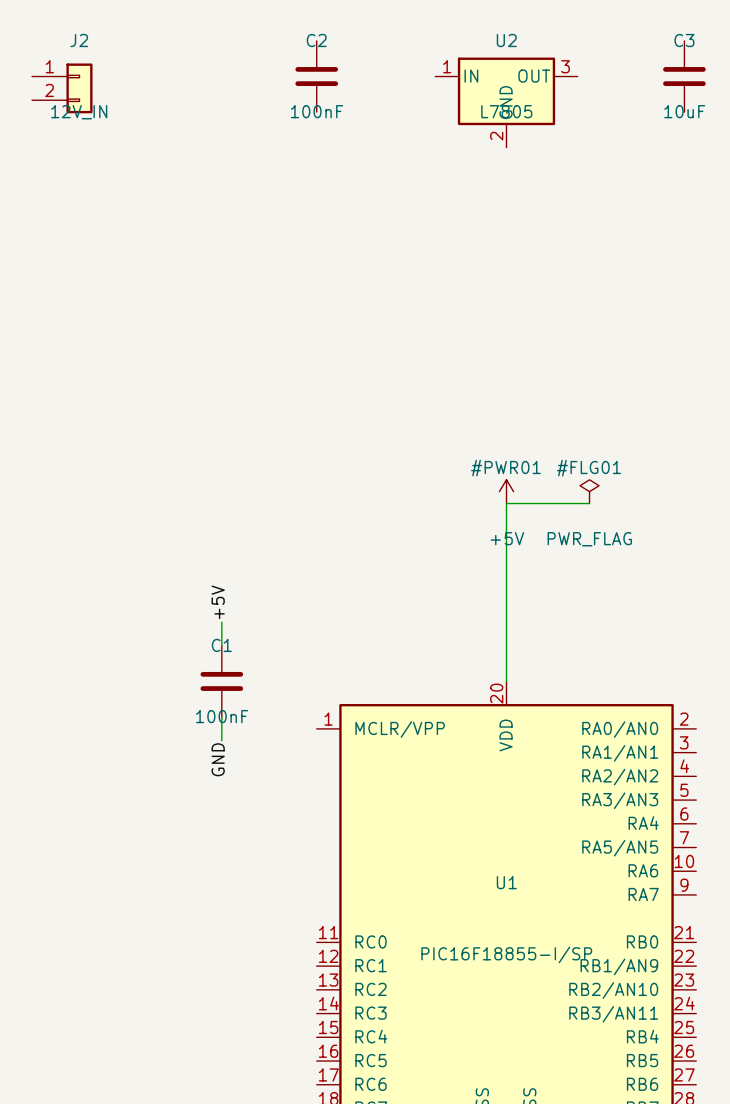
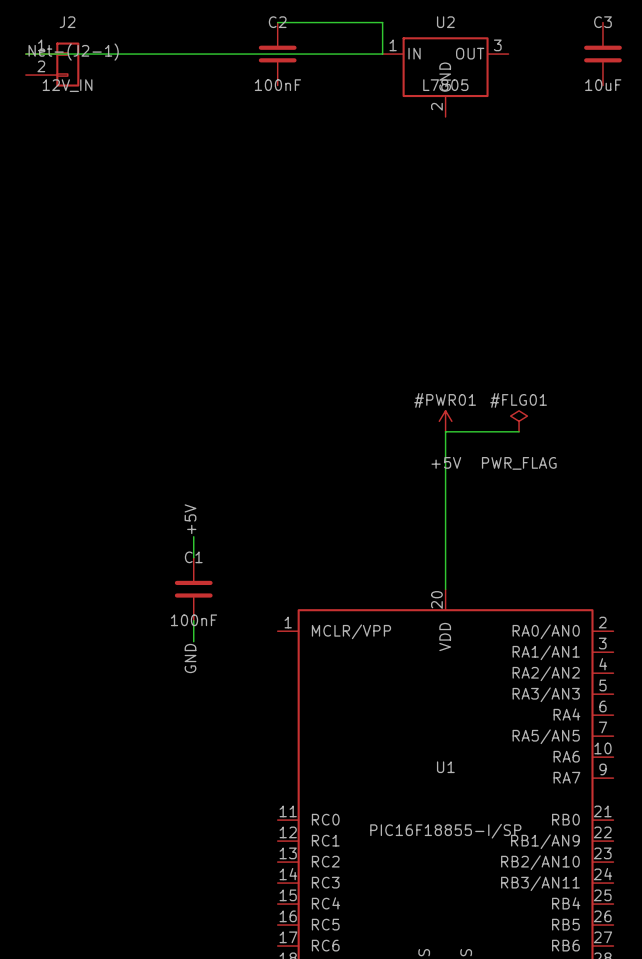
wire: none -> (277, 22) (382, 22) (382, 54) (25, 54)
label: none -> Net-(J2-1) (73, 52)

